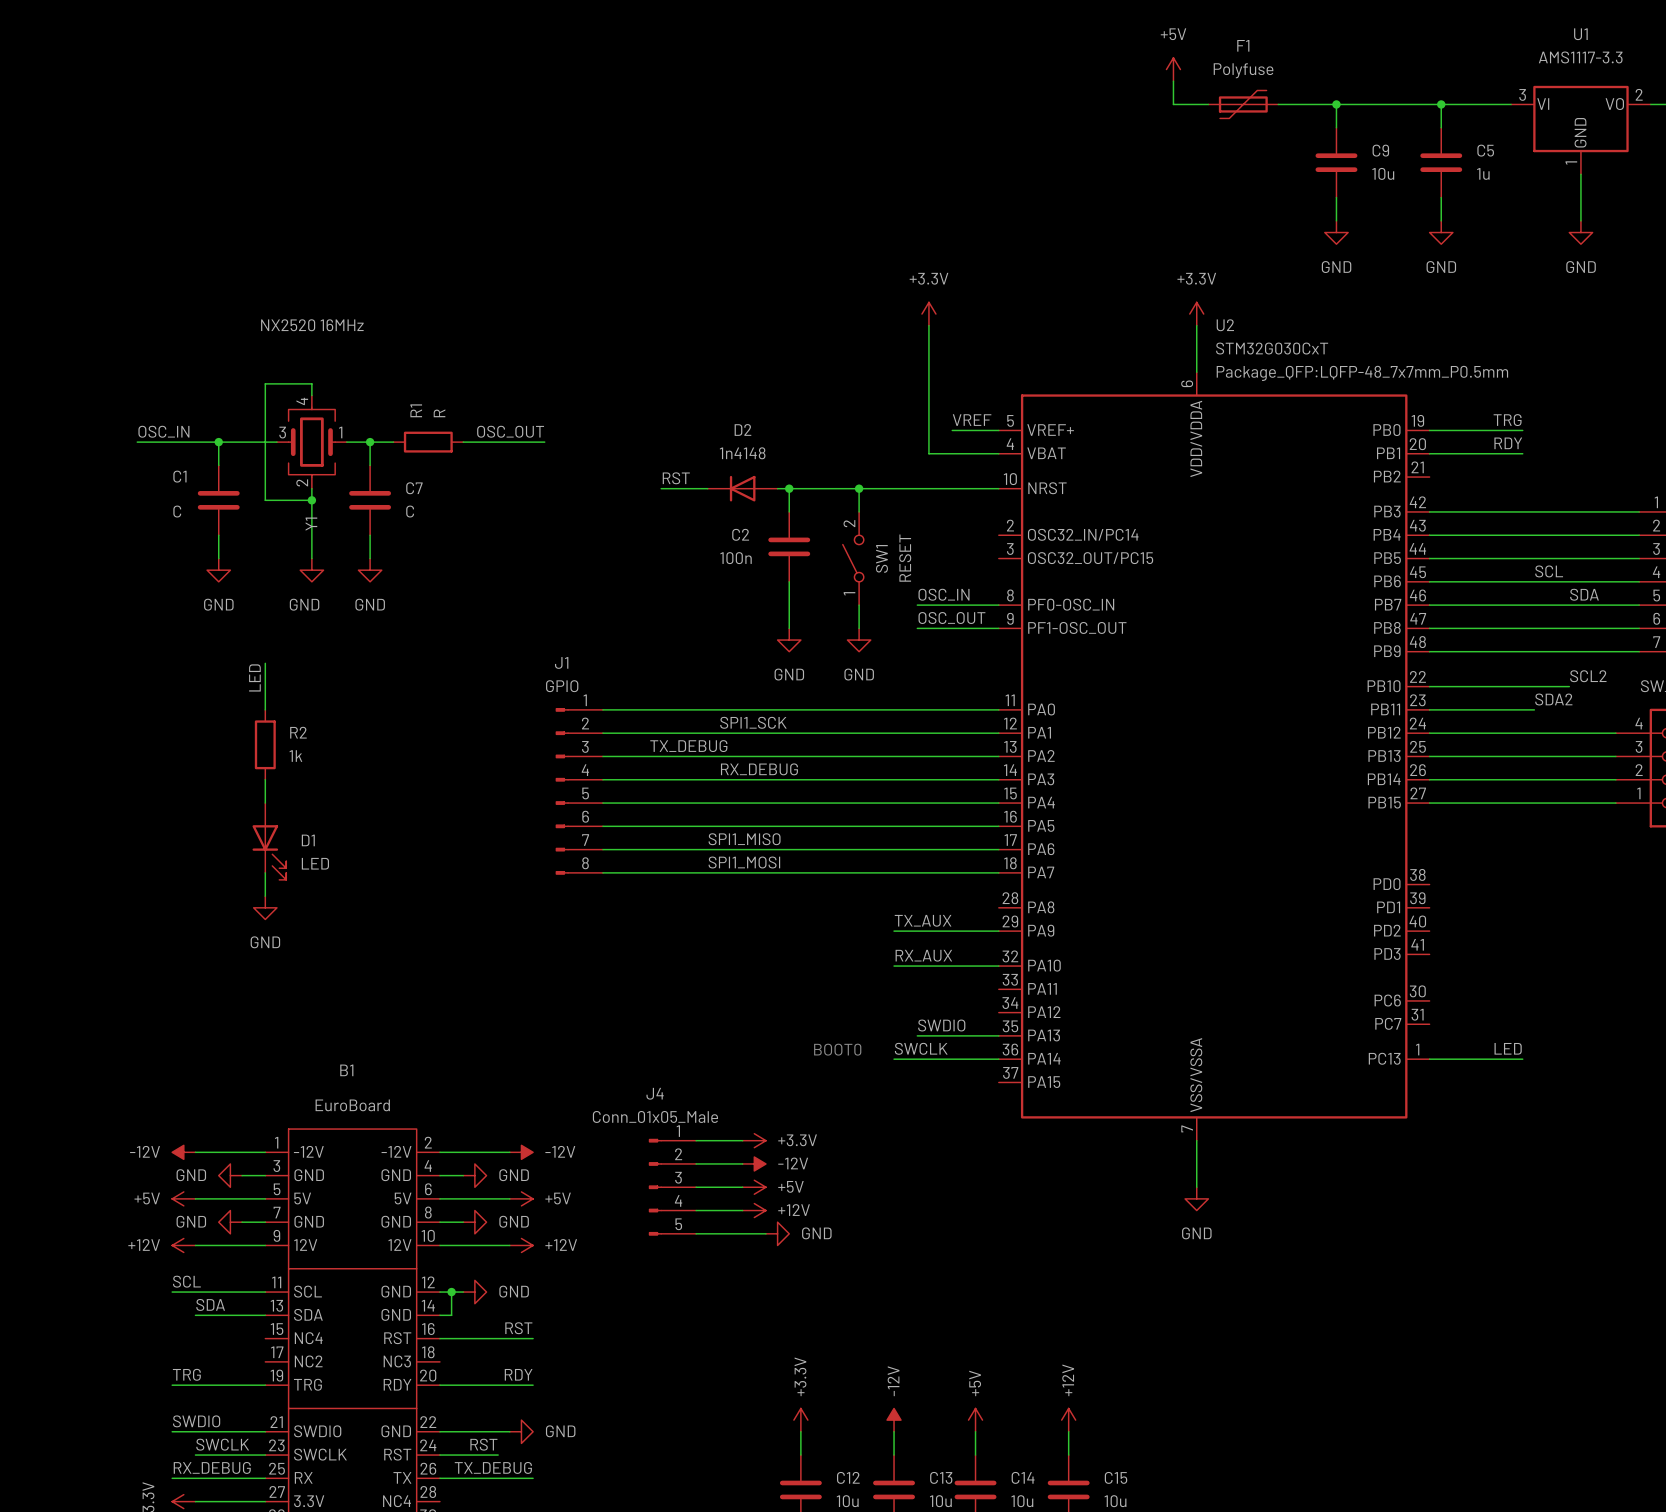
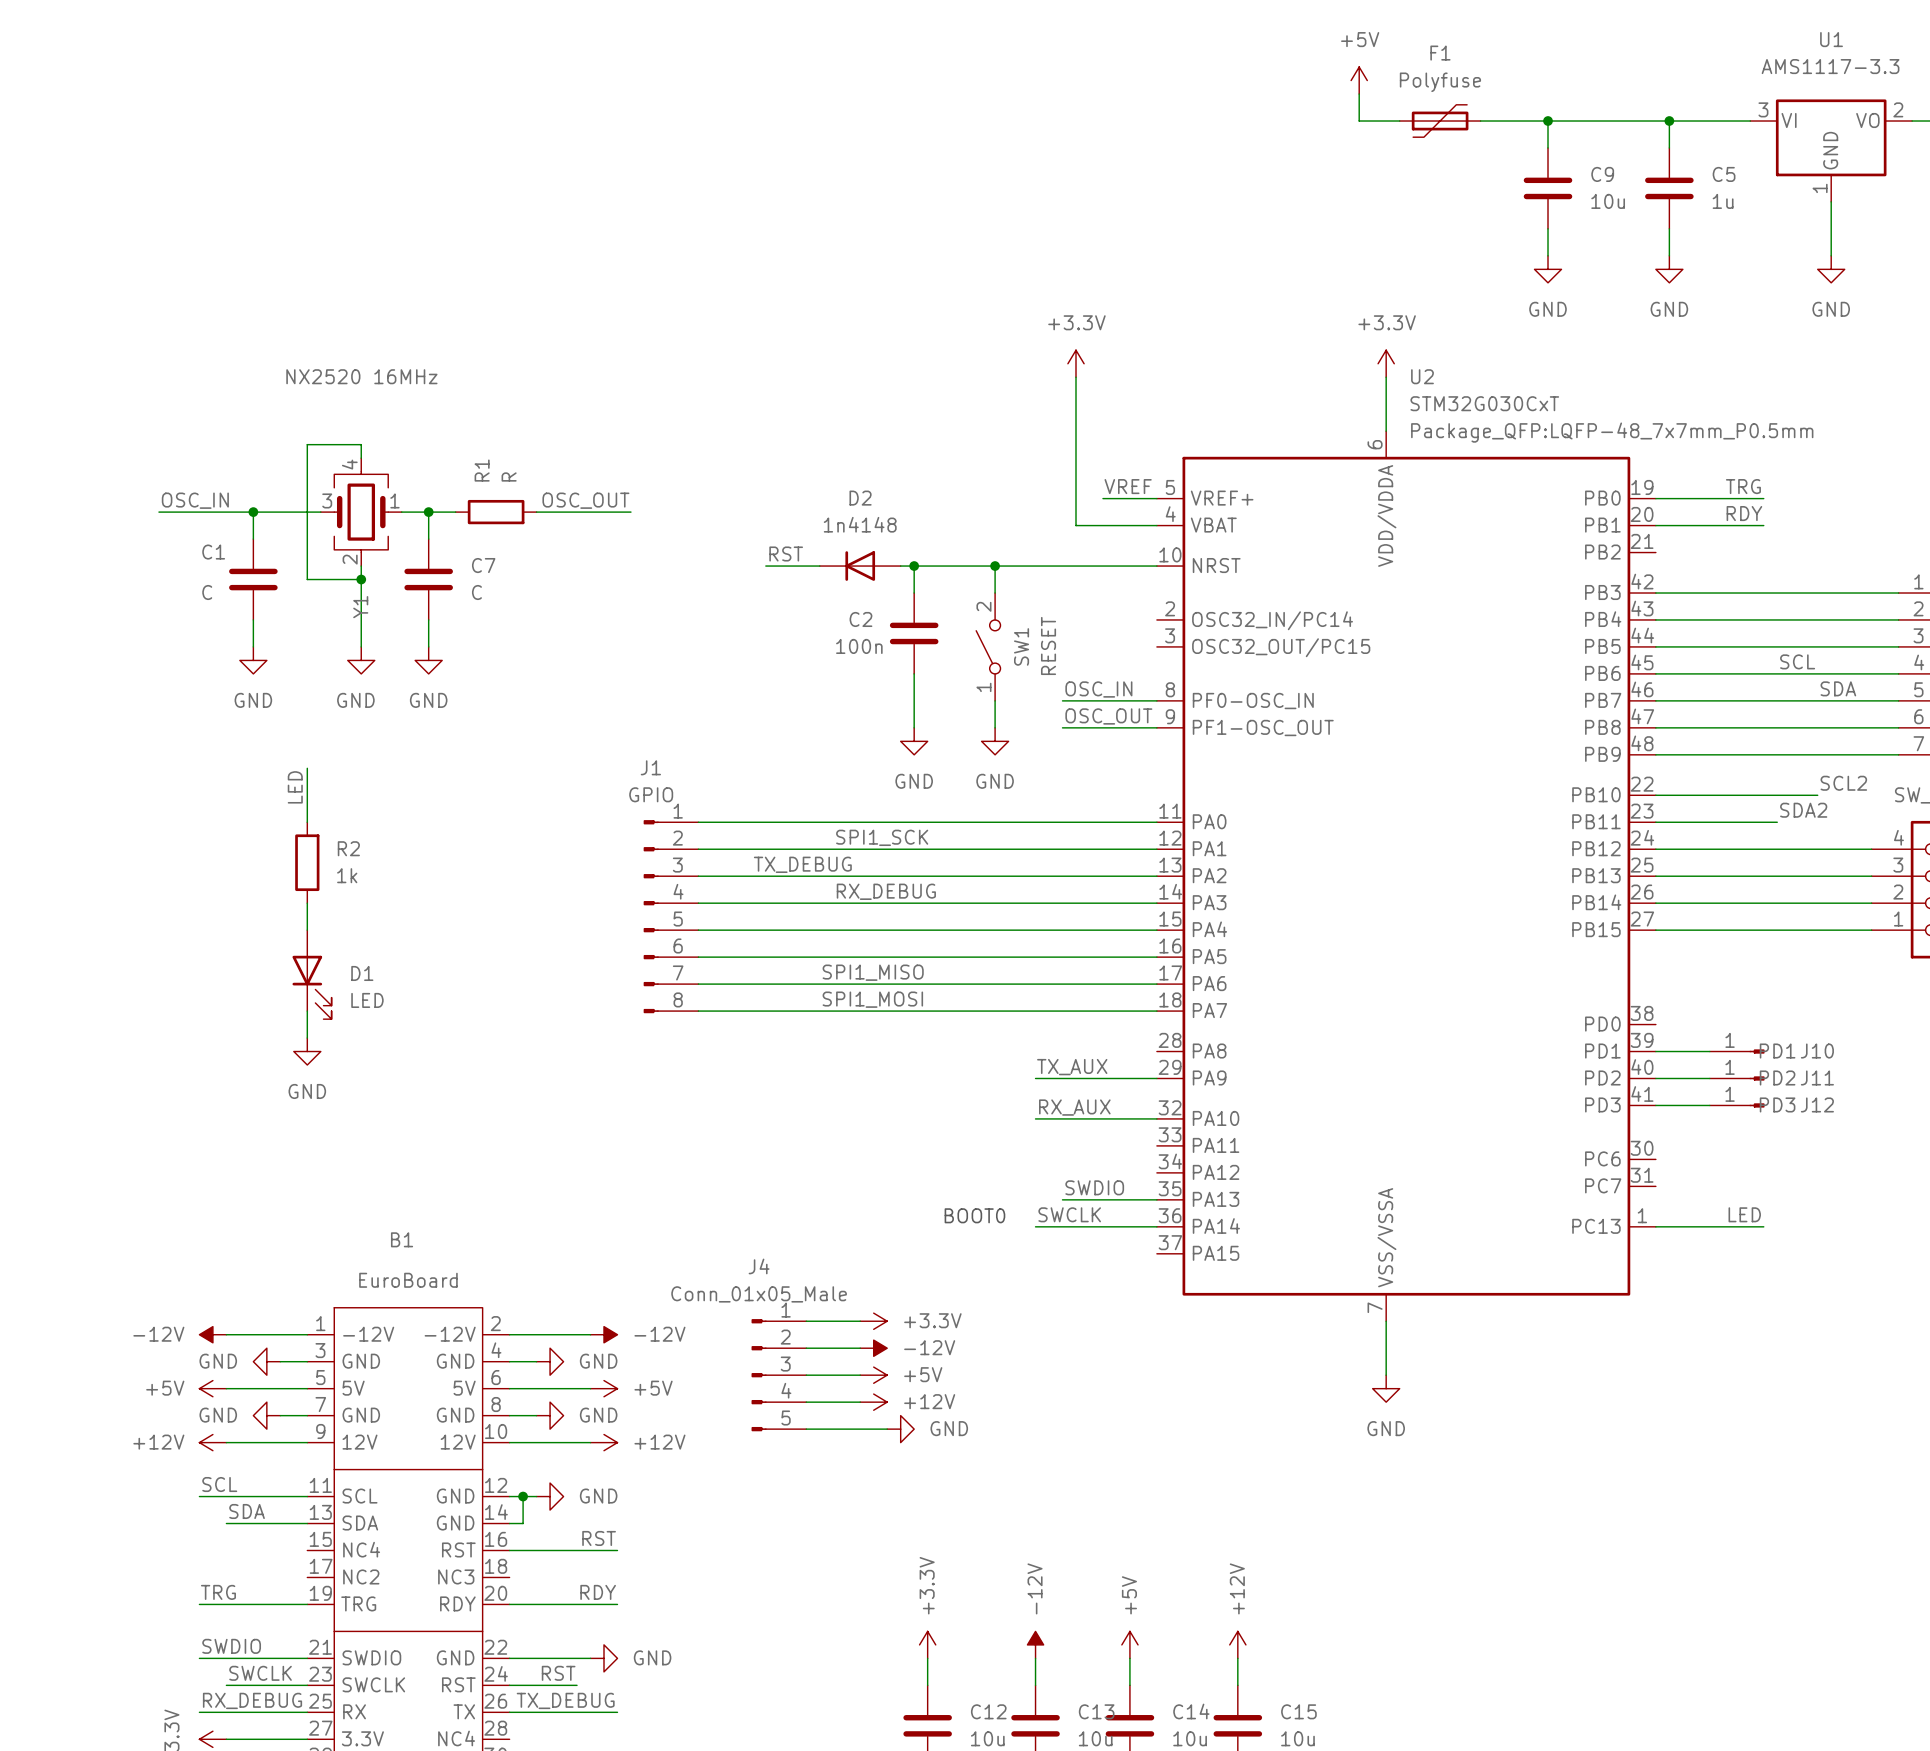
wire: none -> (1655, 1051) (1709, 1051)
J10: none -> PD1 (1737, 1051)
wire: none -> (1655, 1078) (1709, 1078)
J11: none -> PD2 (1737, 1078)
wire: none -> (1655, 1105) (1709, 1105)
J12: none -> PD3 (1737, 1105)

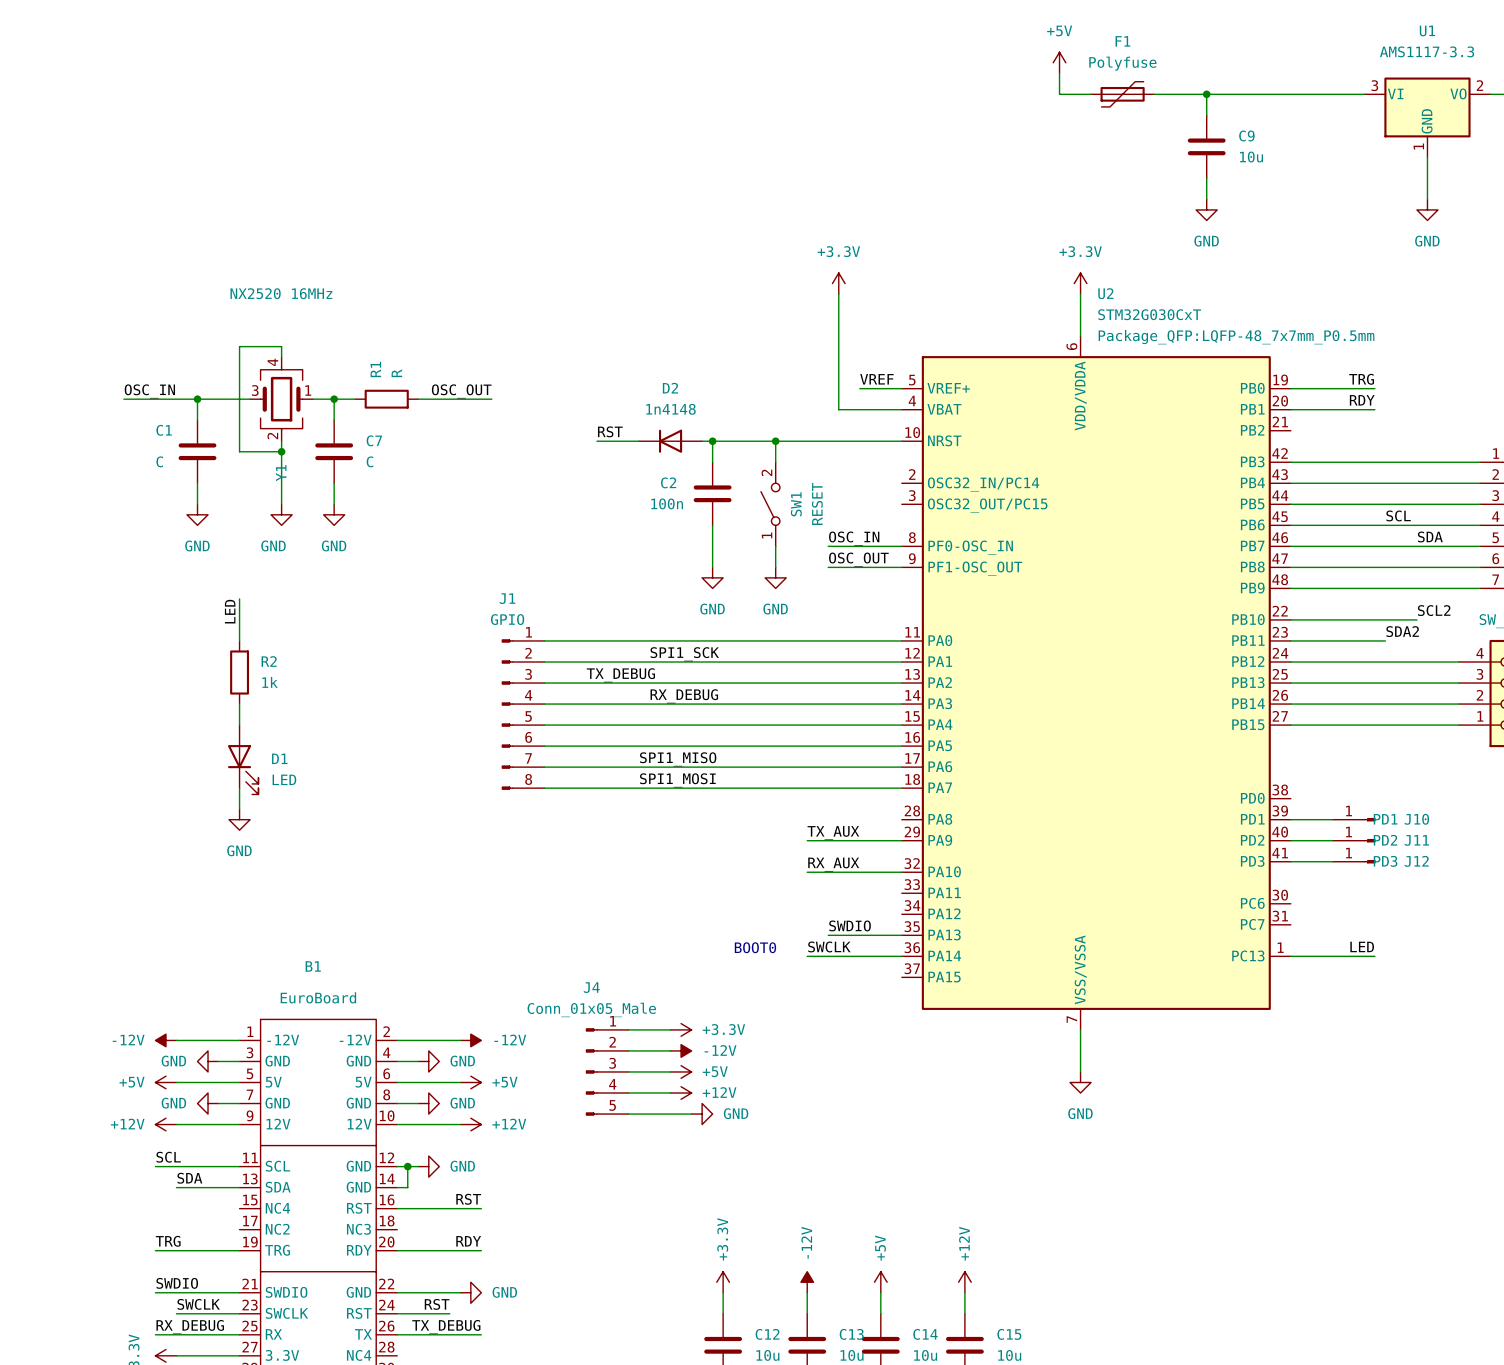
wire: (1669, 121) (1669, 147) -> none
junction: (1669, 121) -> none
C5: 1u (1669, 188) -> none
wire: (1669, 228) (1669, 255) -> none
power symbol: GND (1669, 269) -> none

